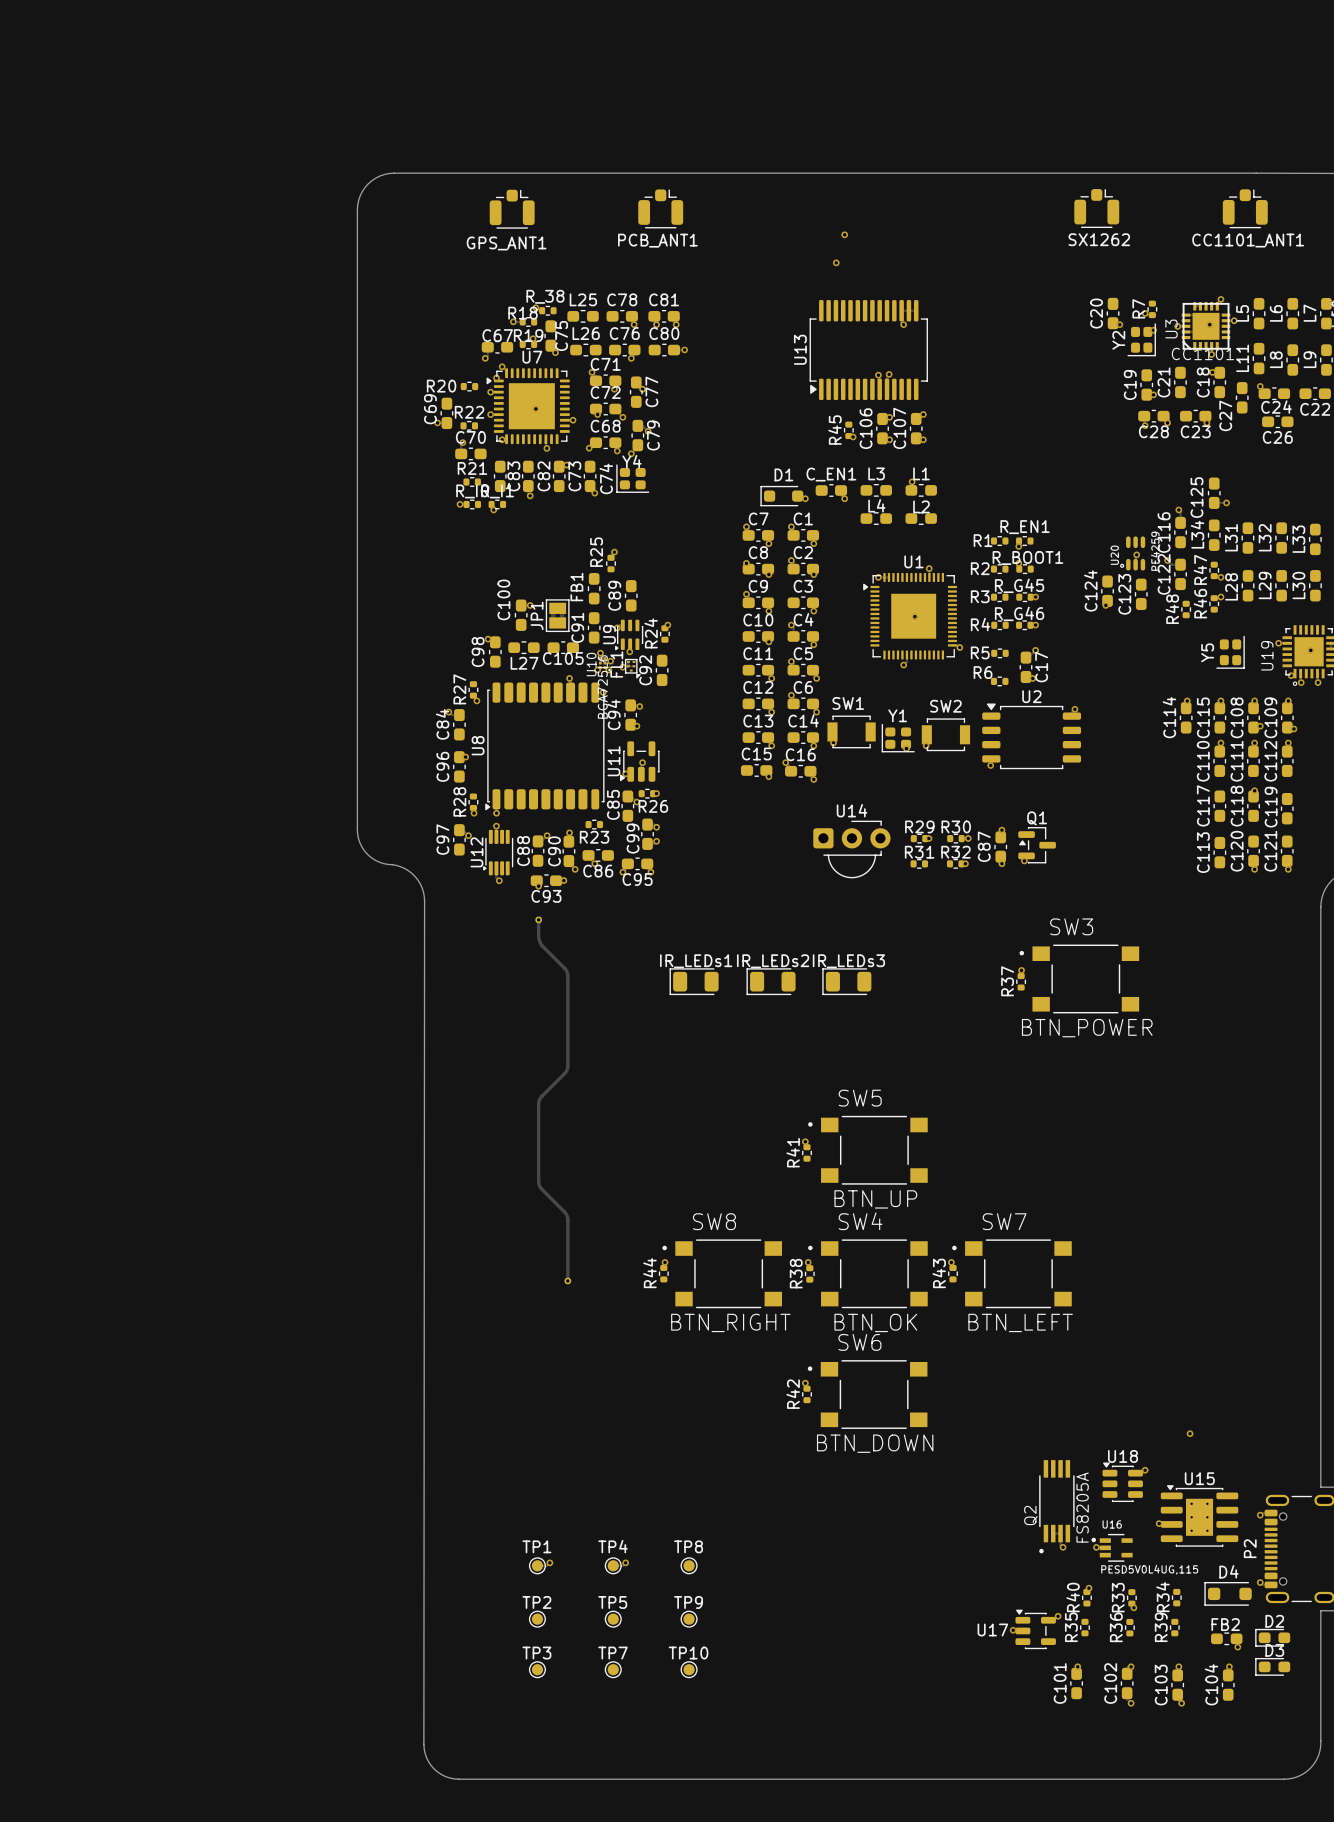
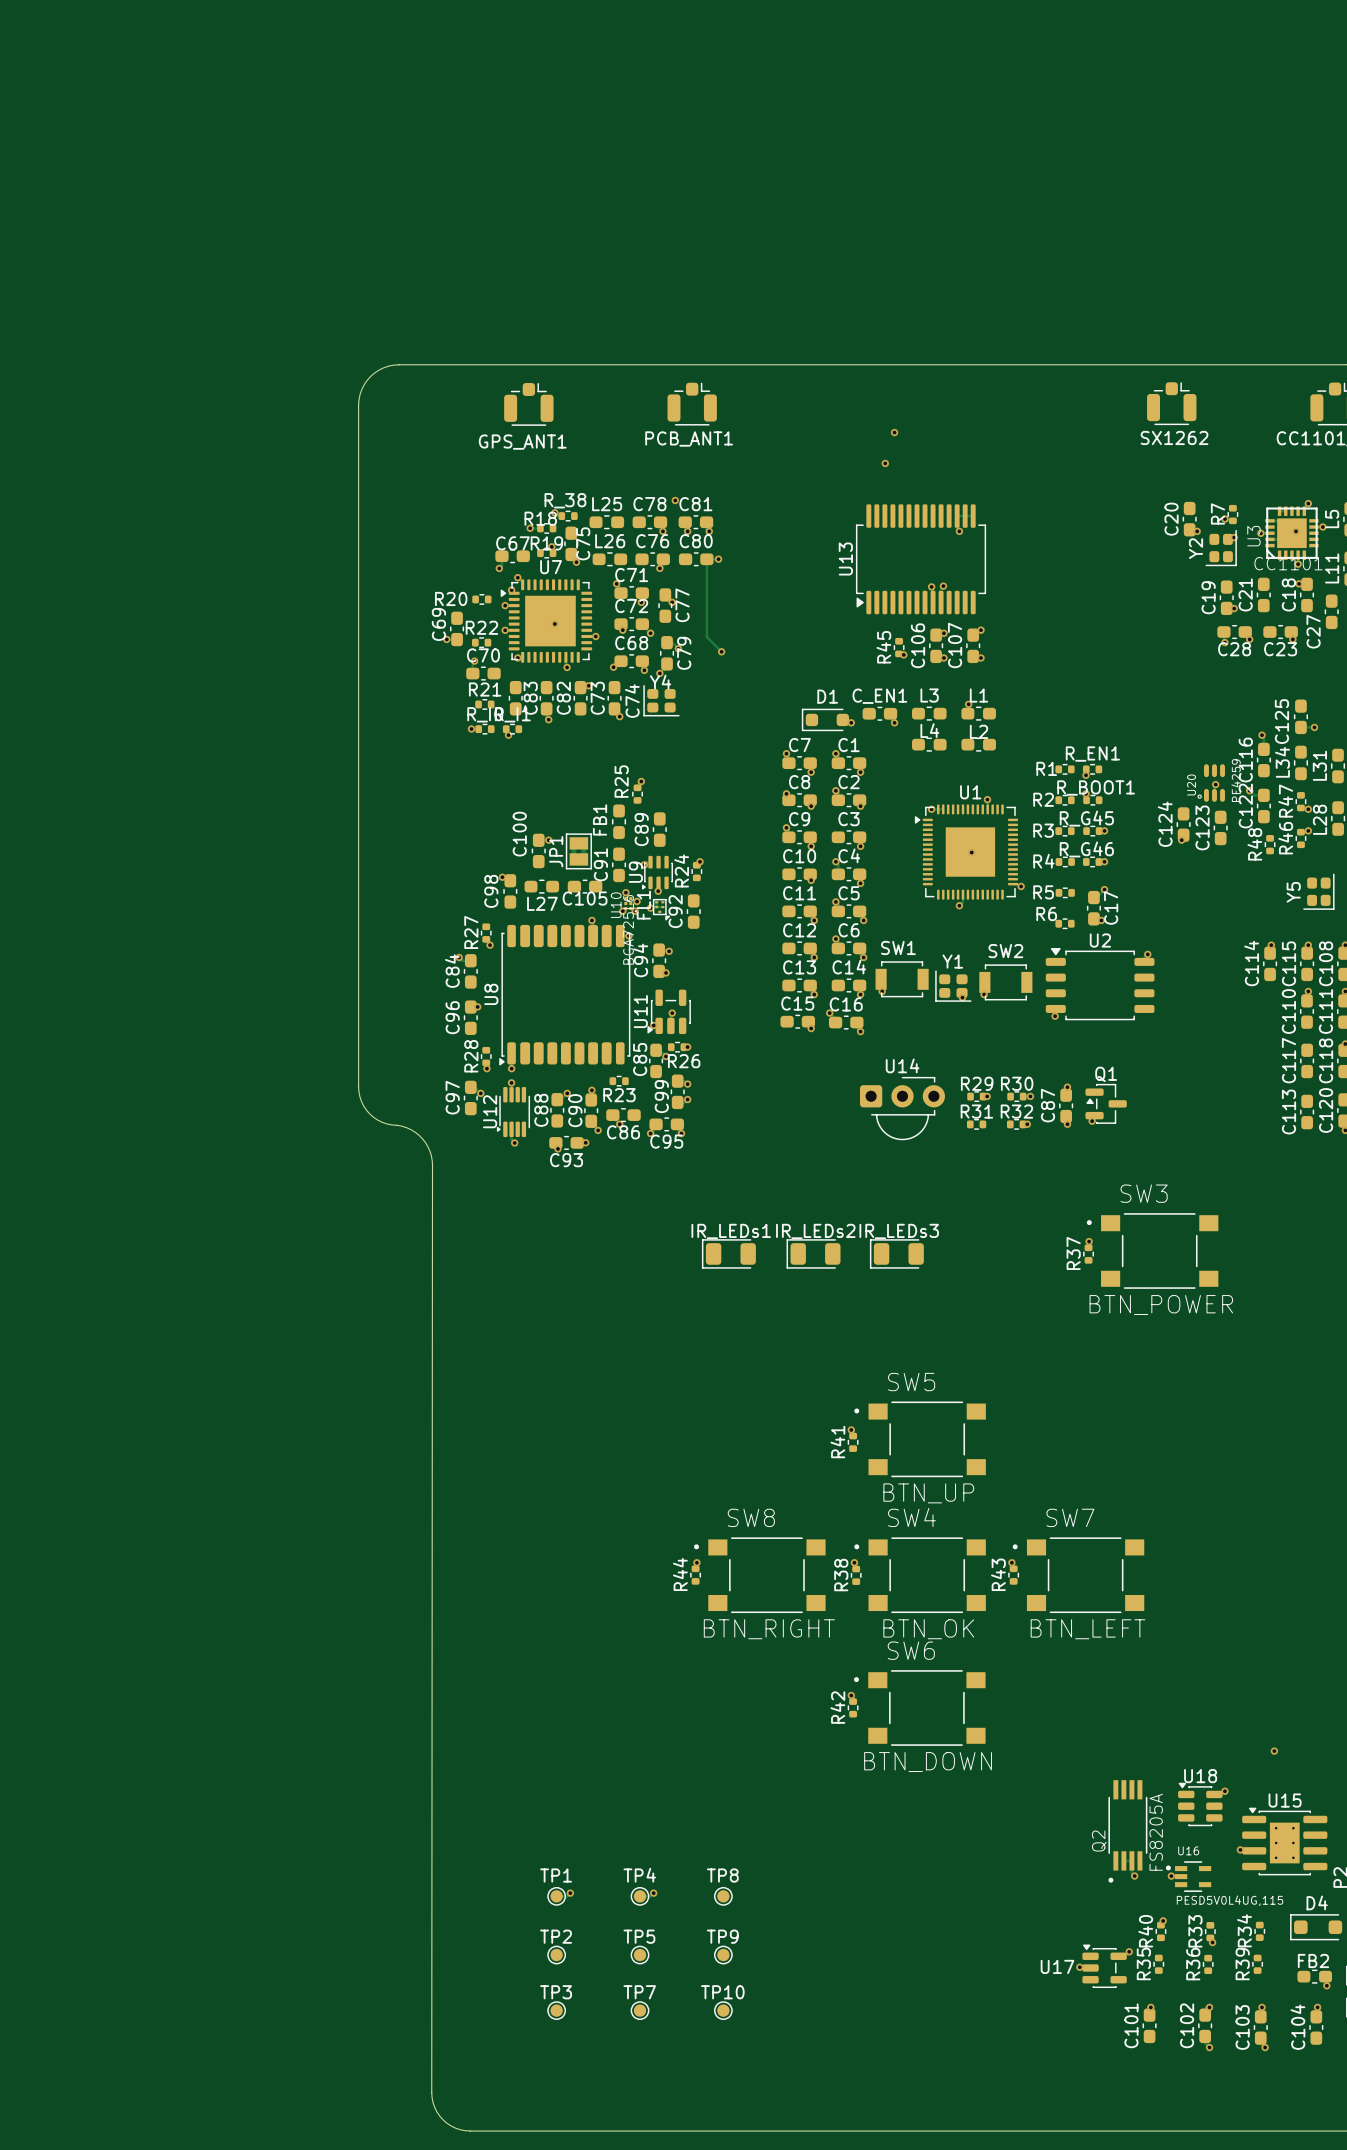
via: none -> (675, 500)
track: none -> (706, 559) (706, 637) (721, 651)
via: none -> (721, 651)
part: (553, 1100) -> none

